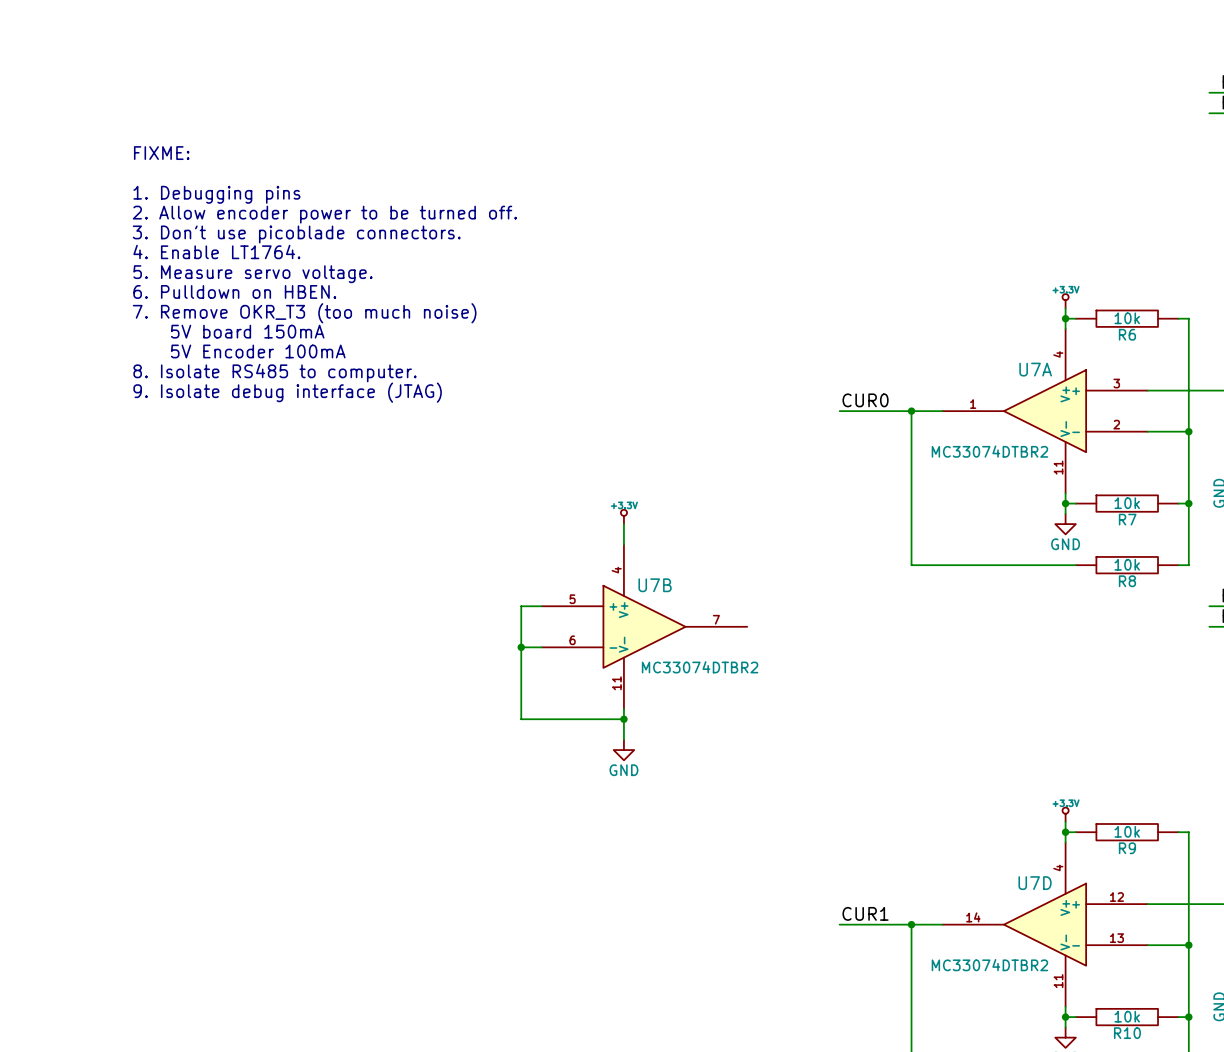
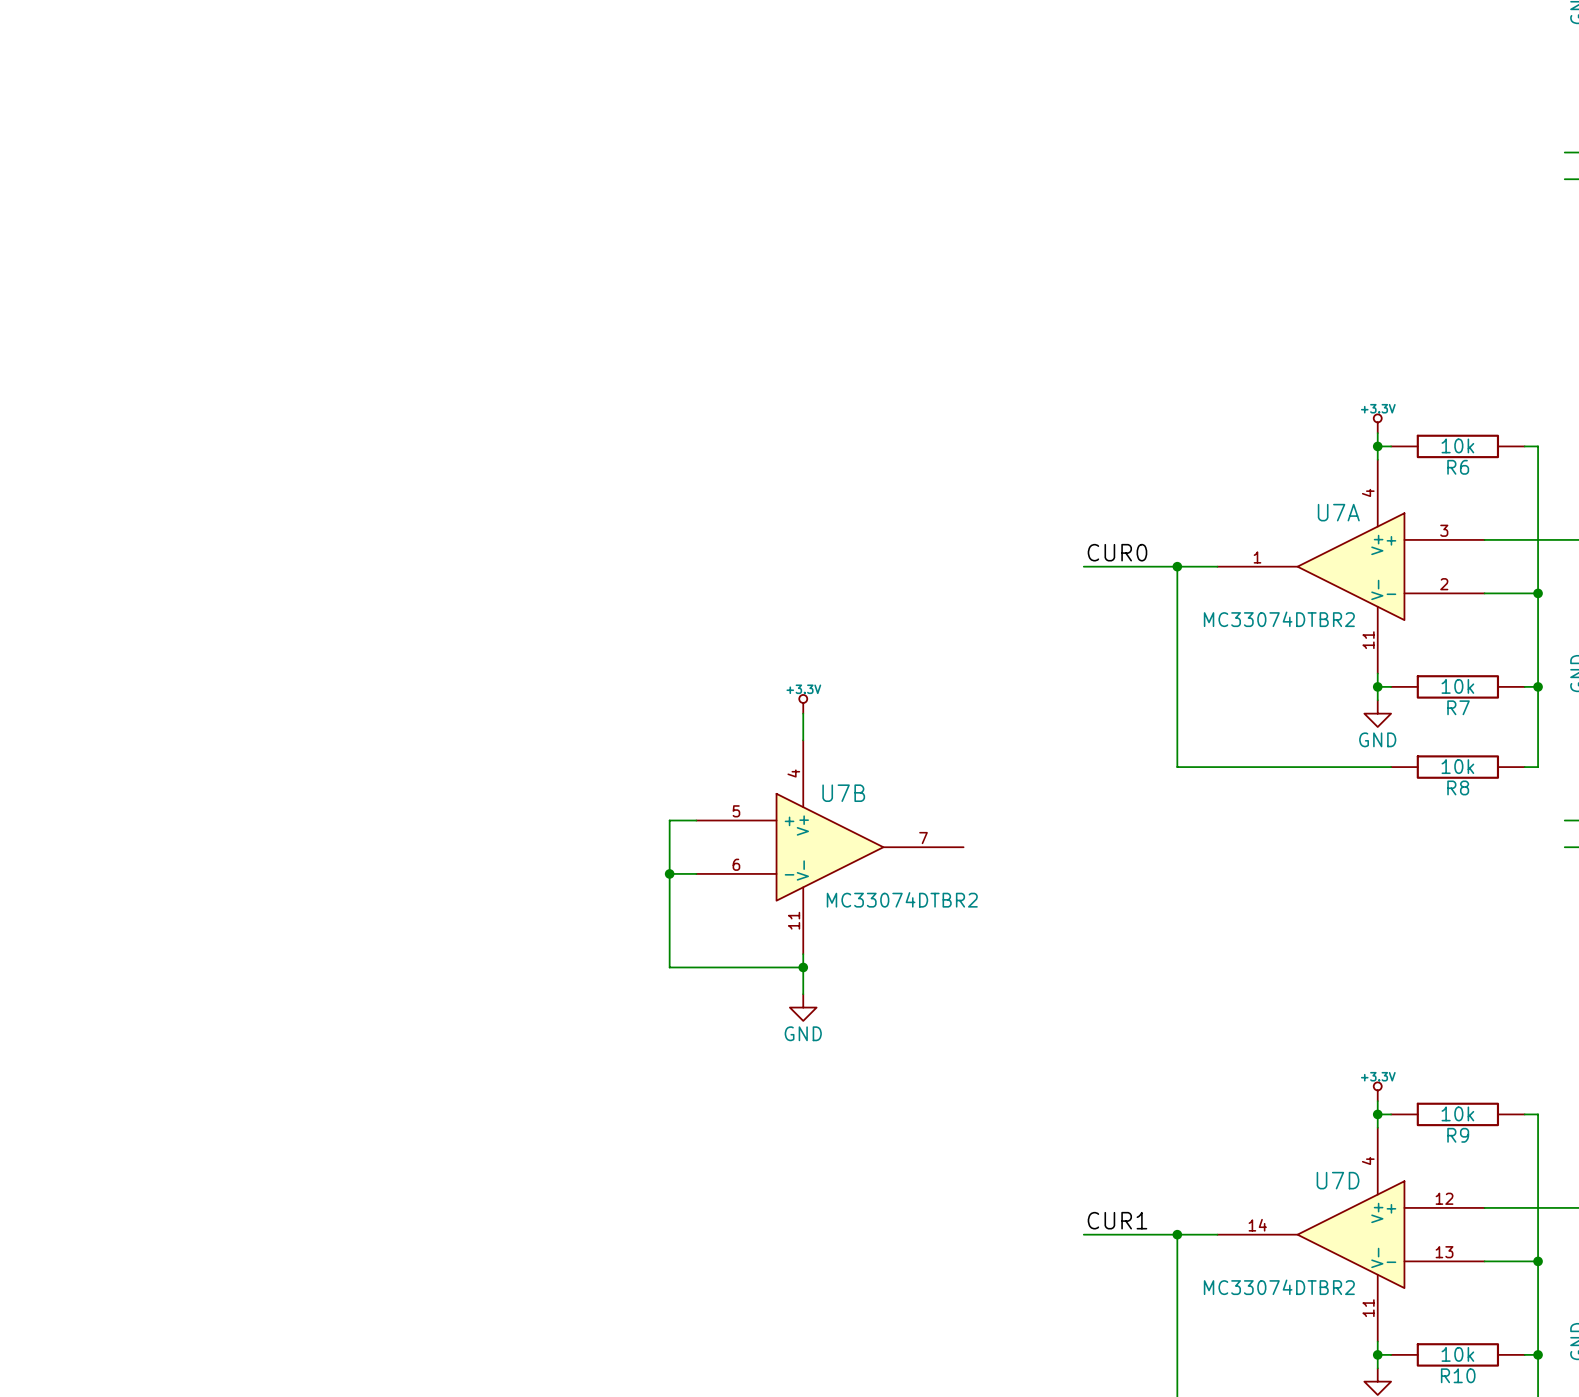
text: FIXME: (161, 153) -> none
text: 1. Debugging pins (216, 194) -> none
text: 2. Allow encoder power to be turned off. (324, 214) -> none
text: 3. Don't use picoblade connectors. (296, 234) -> none
text: 4. Enable LT1764. (216, 251) -> none
text: 5. Measure servo voltage. (252, 274) -> none
text: 6. Pulldown on HBEN. (234, 291) -> none
text: 7. Remove OKR_T3 (too much noise) (304, 313) -> none
text: 5V board 150mA (247, 331) -> none
text: 5V Encoder 100mA (258, 351) -> none
text: 8. Isolate RS485 to computer. (274, 373) -> none
text: 9. Isolate debug interface (JTAG) (287, 392) -> none

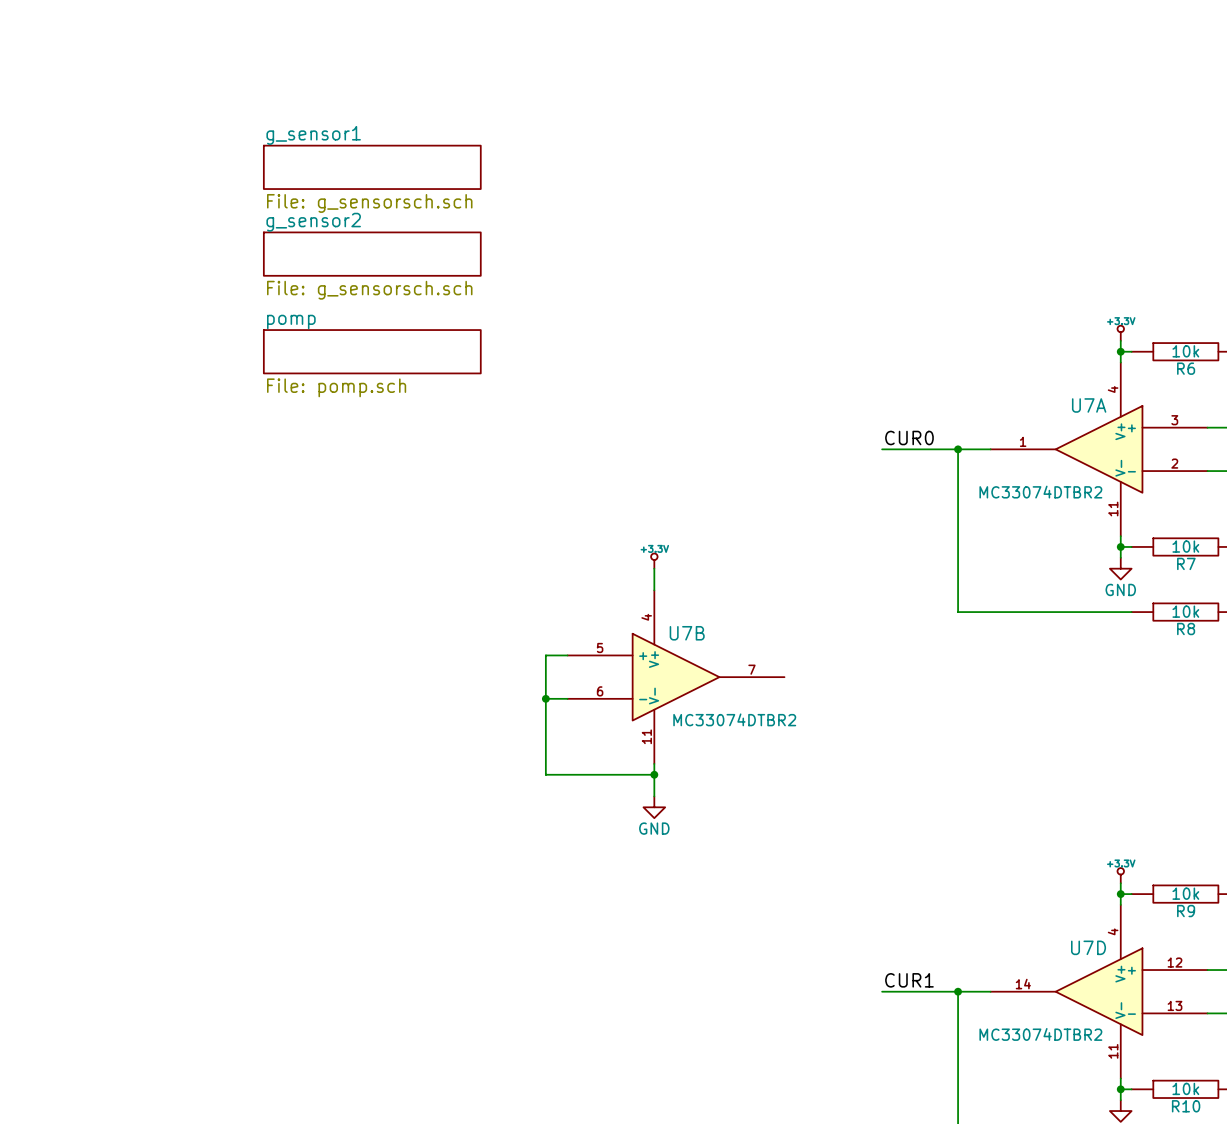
sheet g_sensor1: none -> File: g_sensorsch.sch (372, 167)
sheet g_sensor2: none -> File: g_sensorsch.sch (372, 254)
sheet pomp: none -> File: pomp.sch (372, 351)

